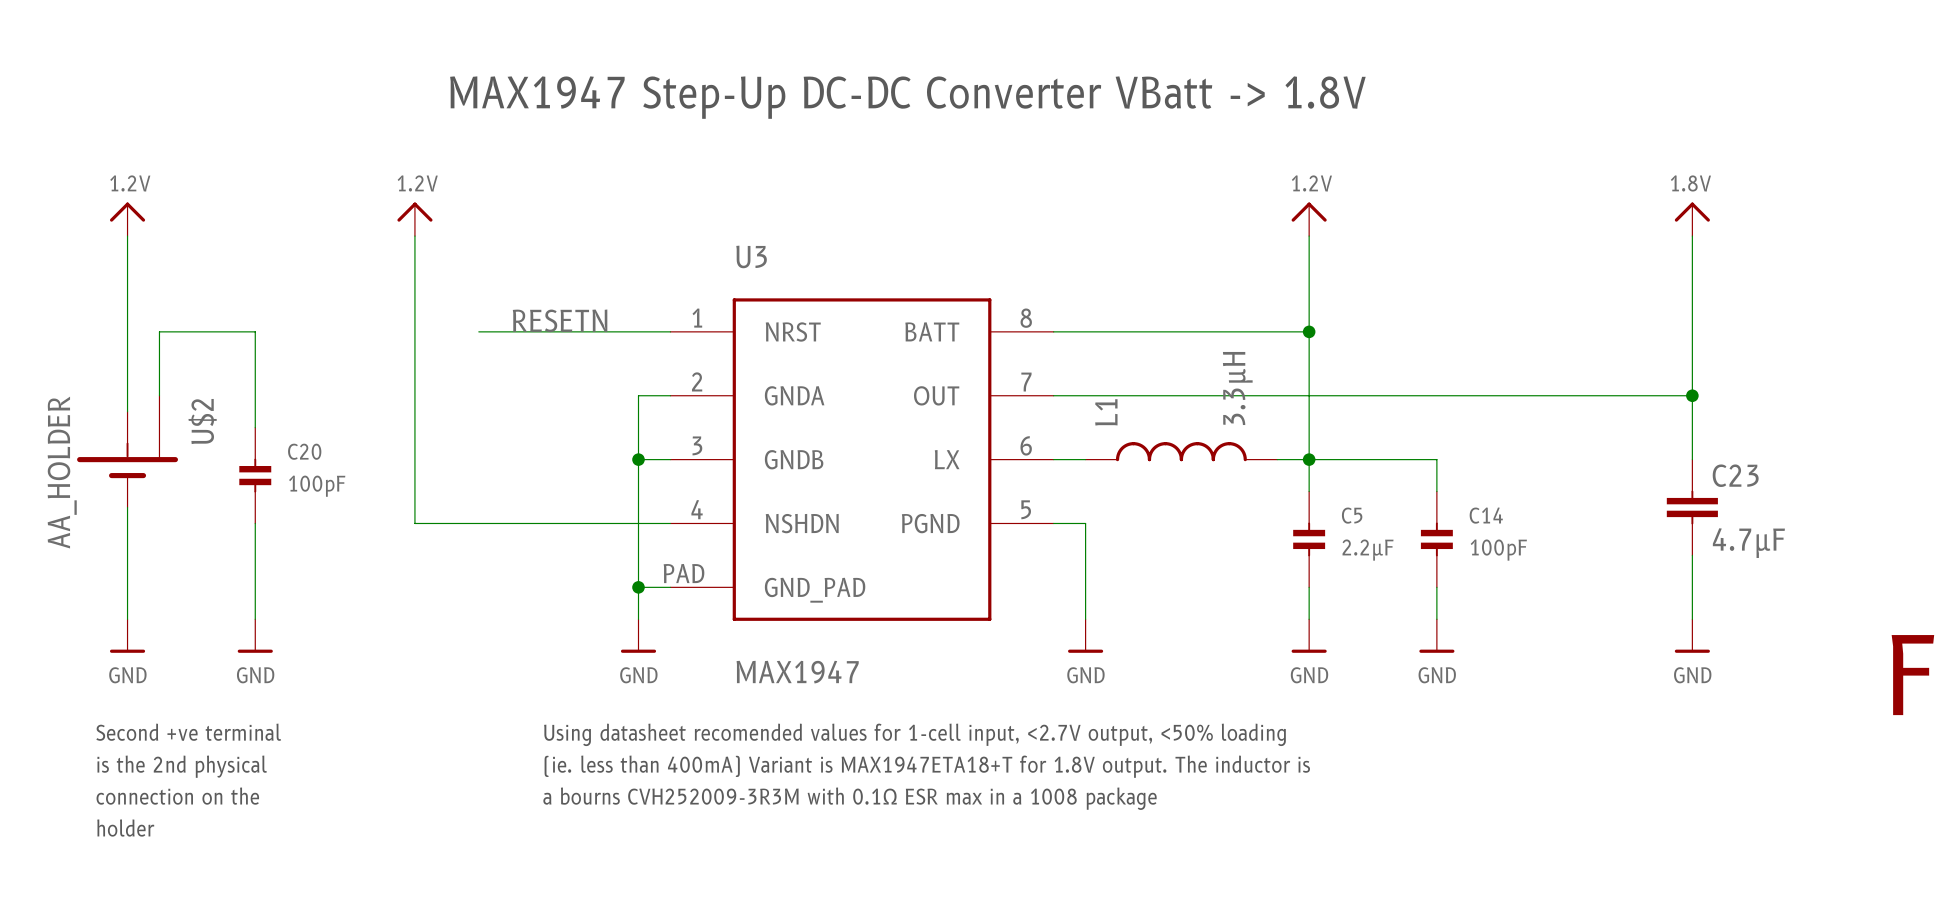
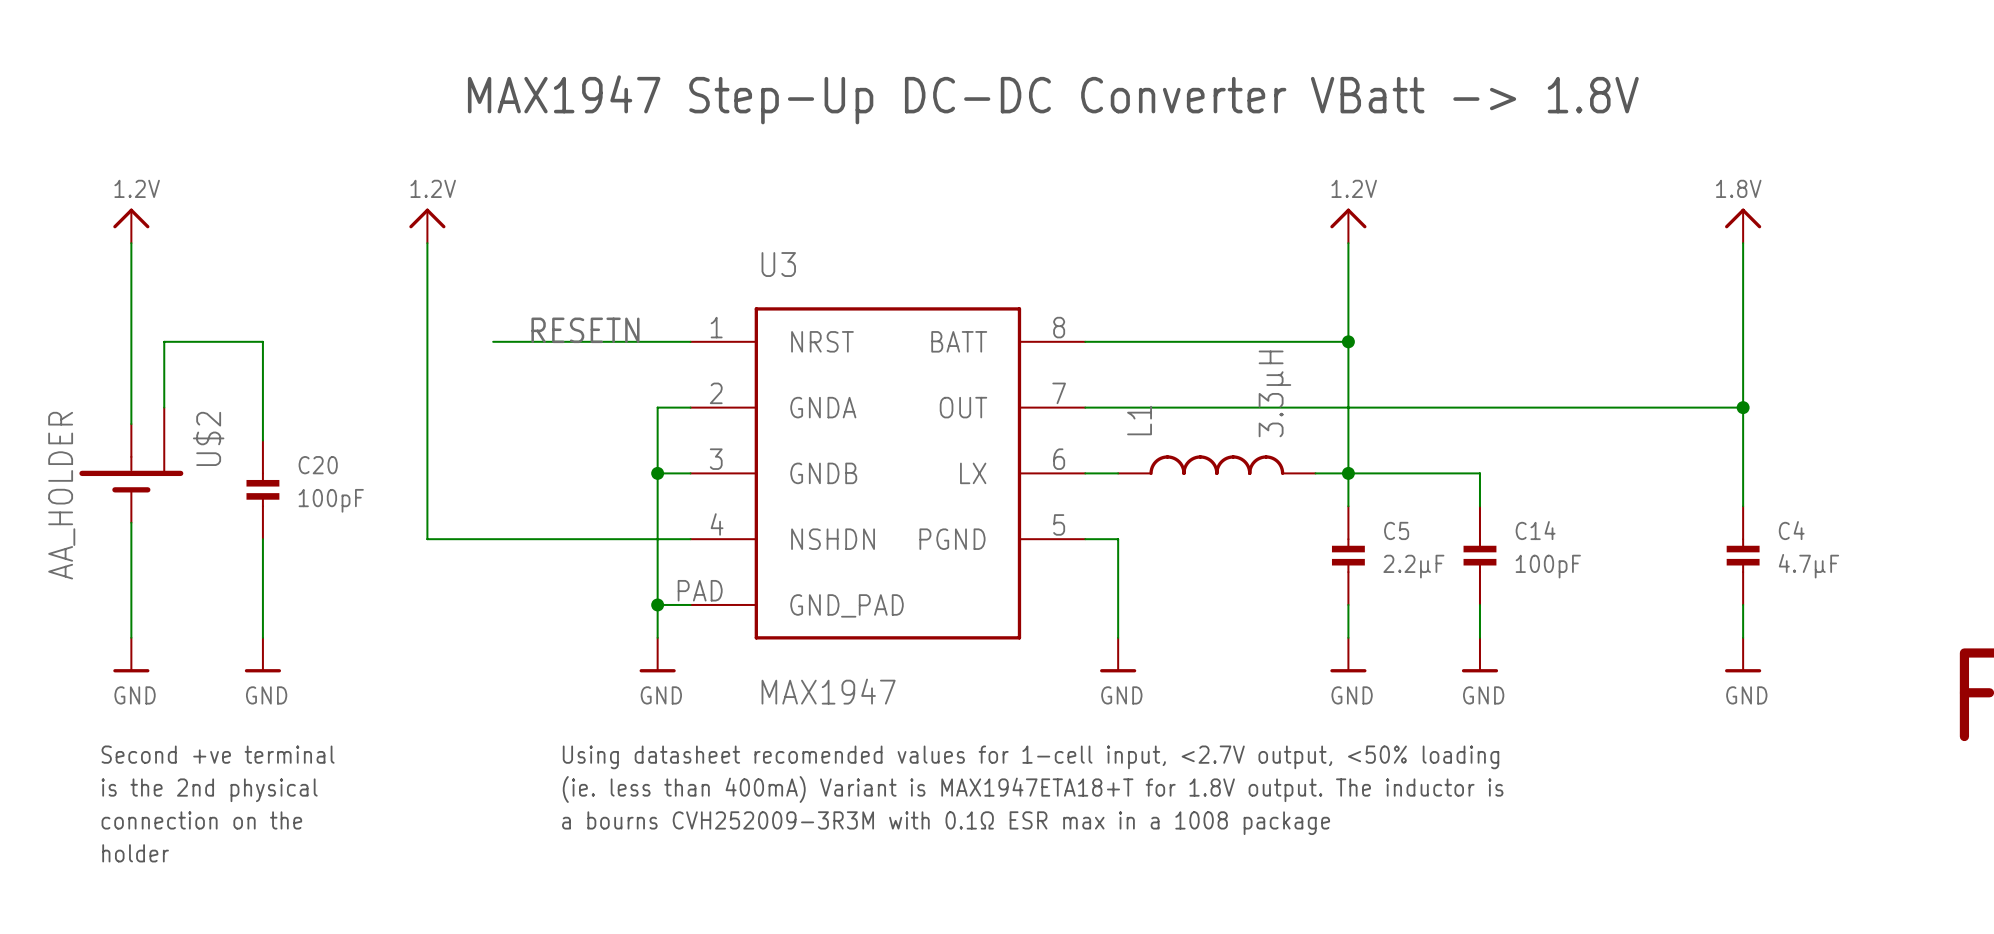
C23: 4.7µF (1692, 507) -> none
C4: none -> 4.7µF (1743, 555)

